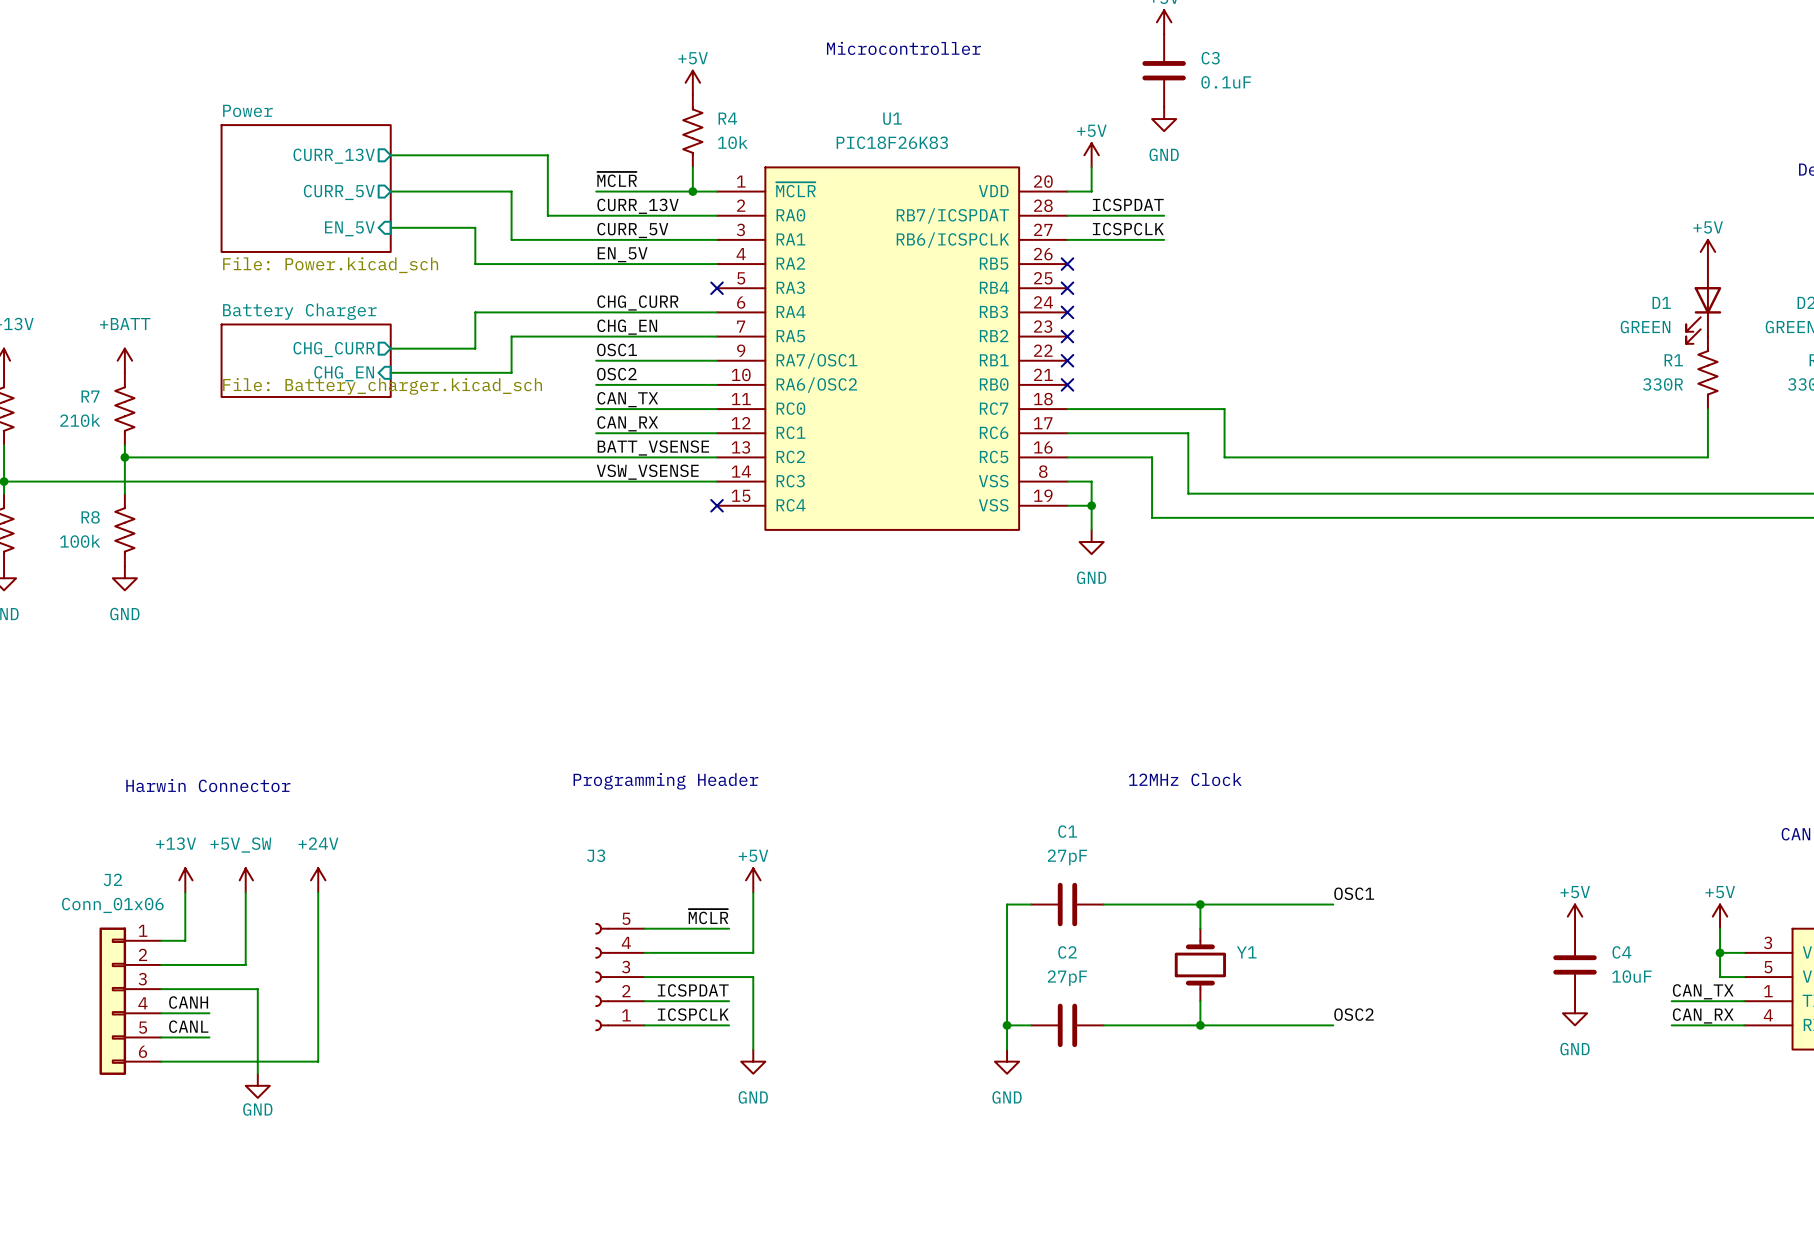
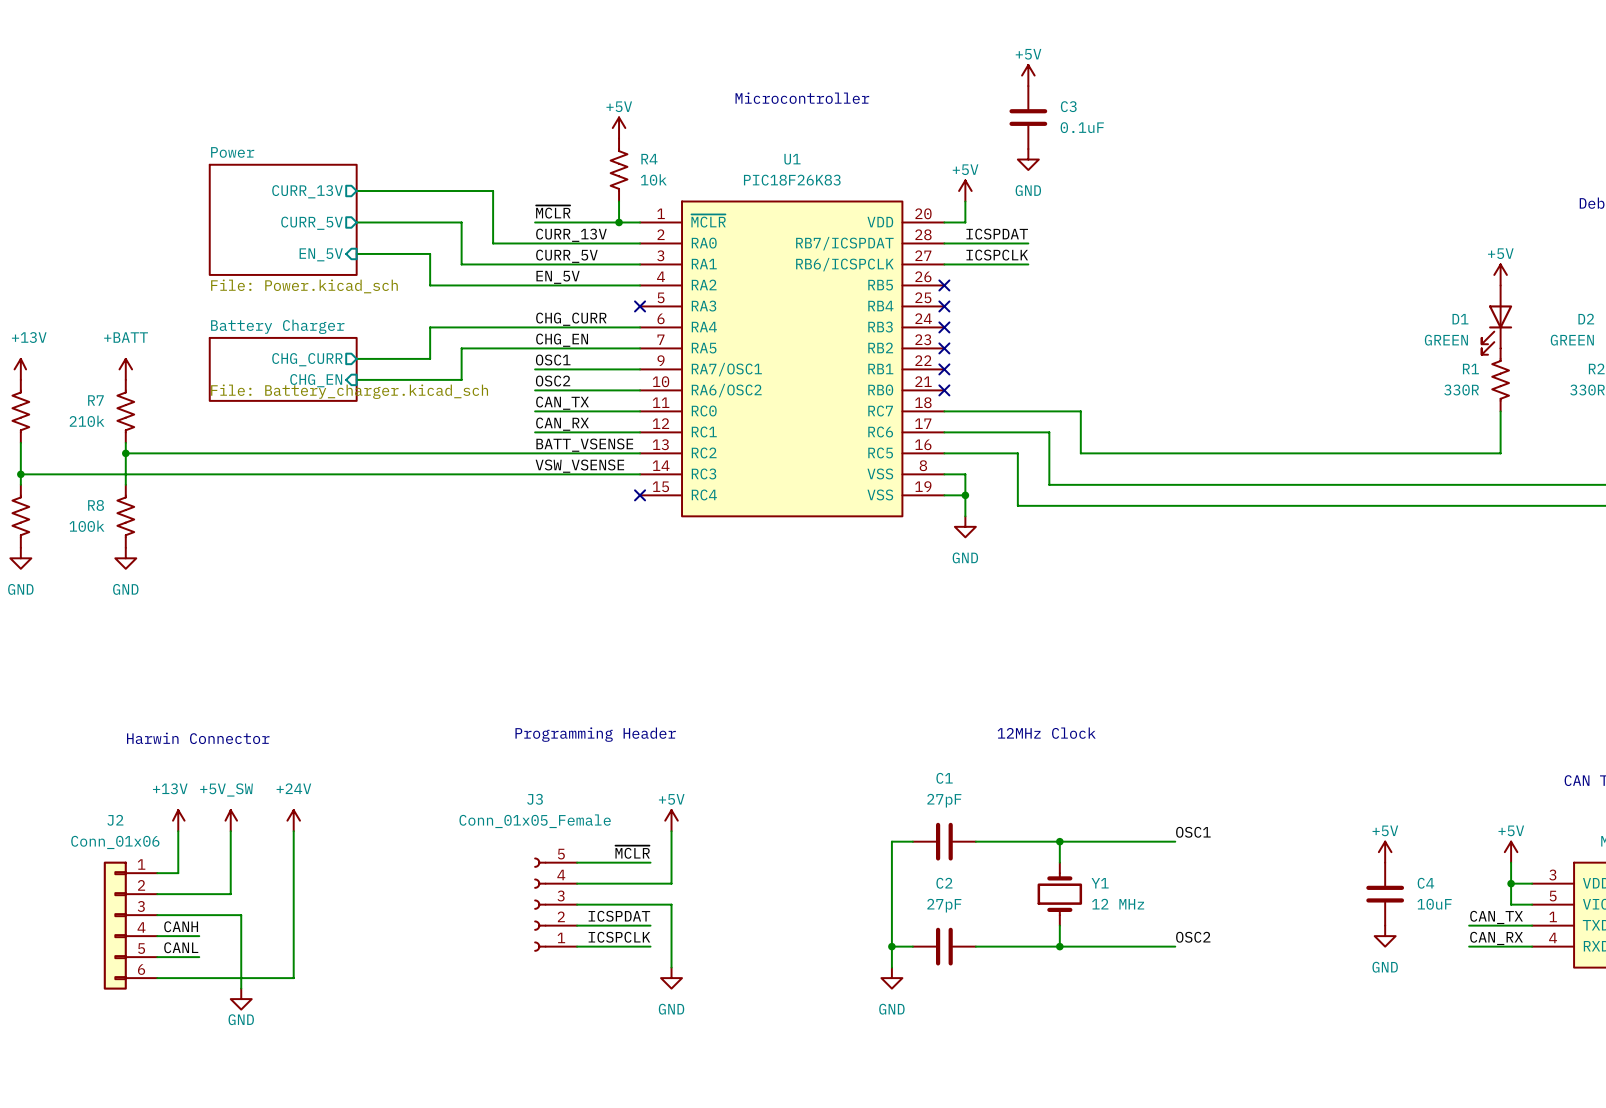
J3 value: none -> Conn_01x05_Female (535, 821)
Y1 value: none -> 12 MHz (1118, 904)

